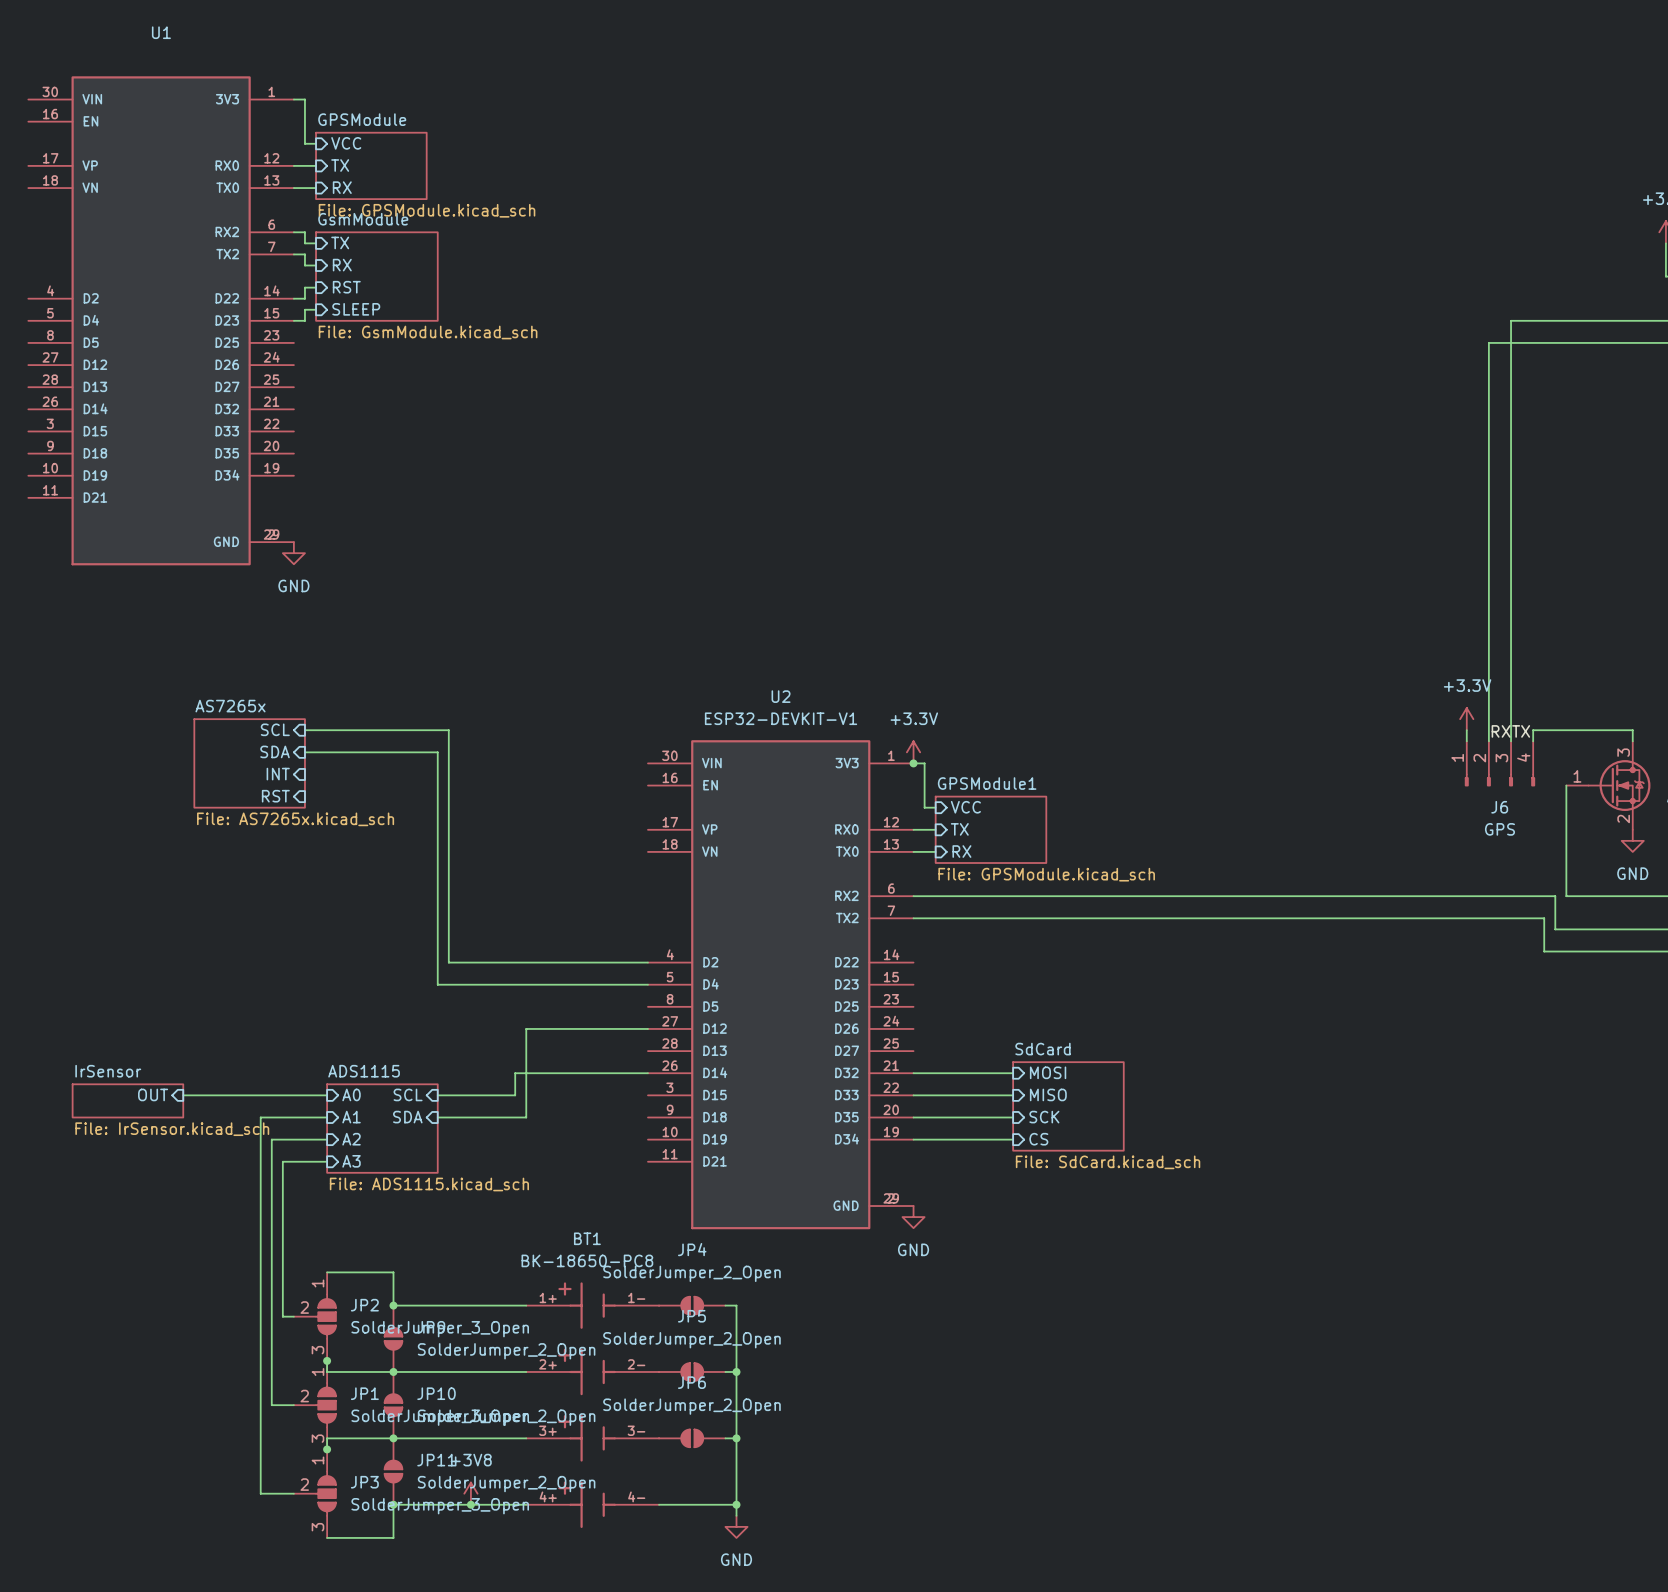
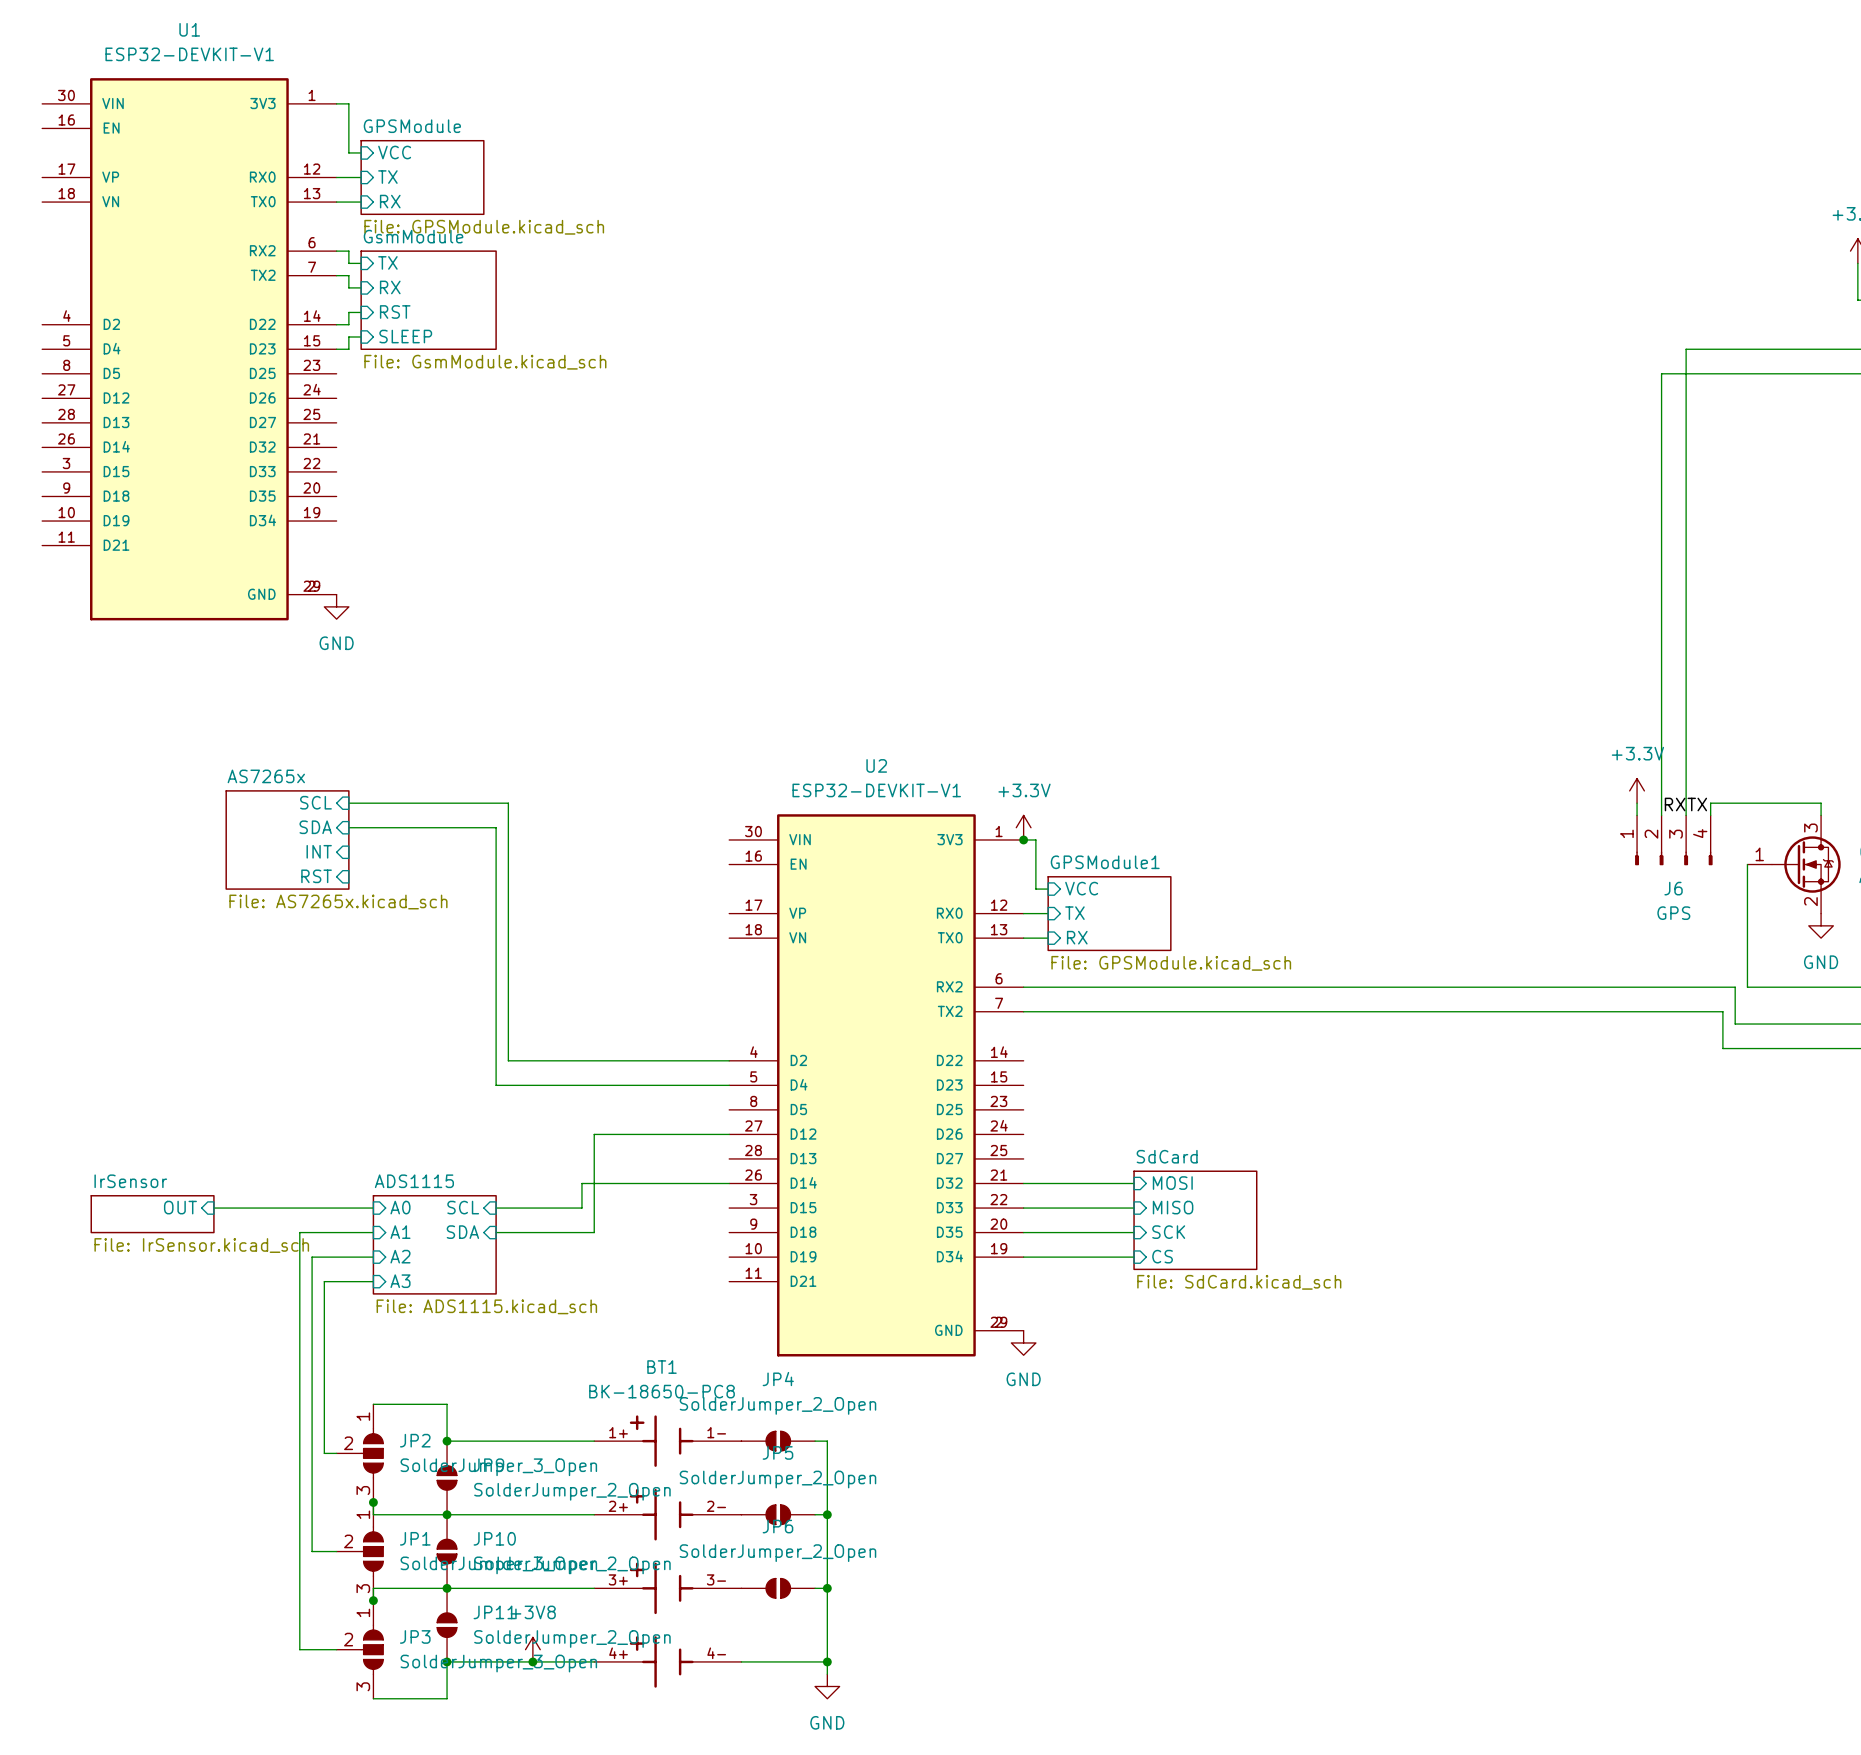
U1 value: none -> ESP32-DEVKIT-V1 (189, 54)

